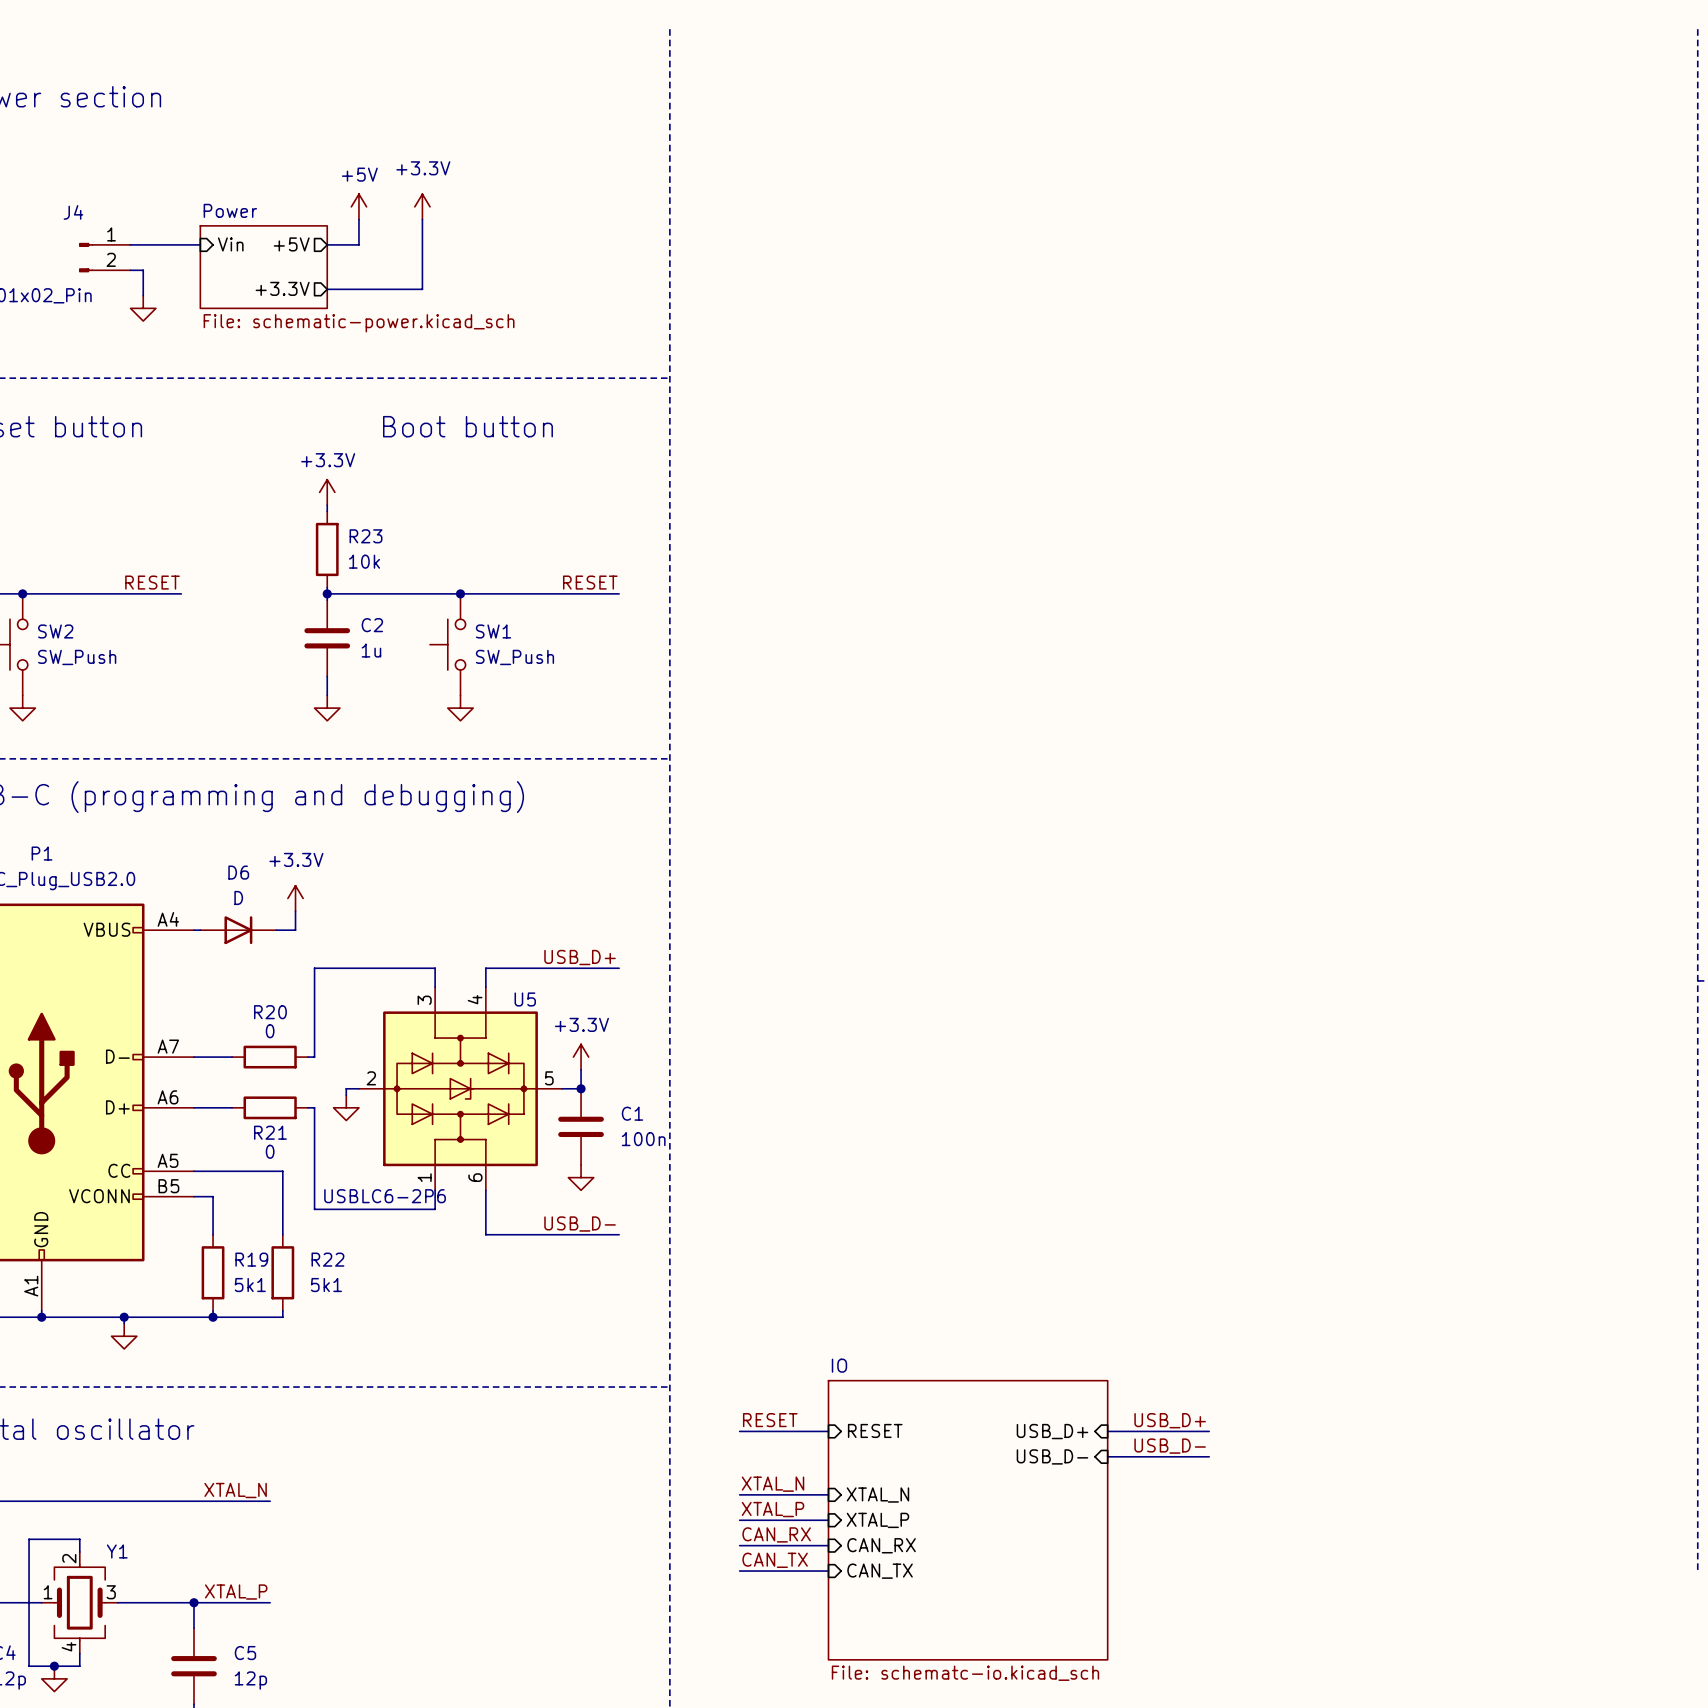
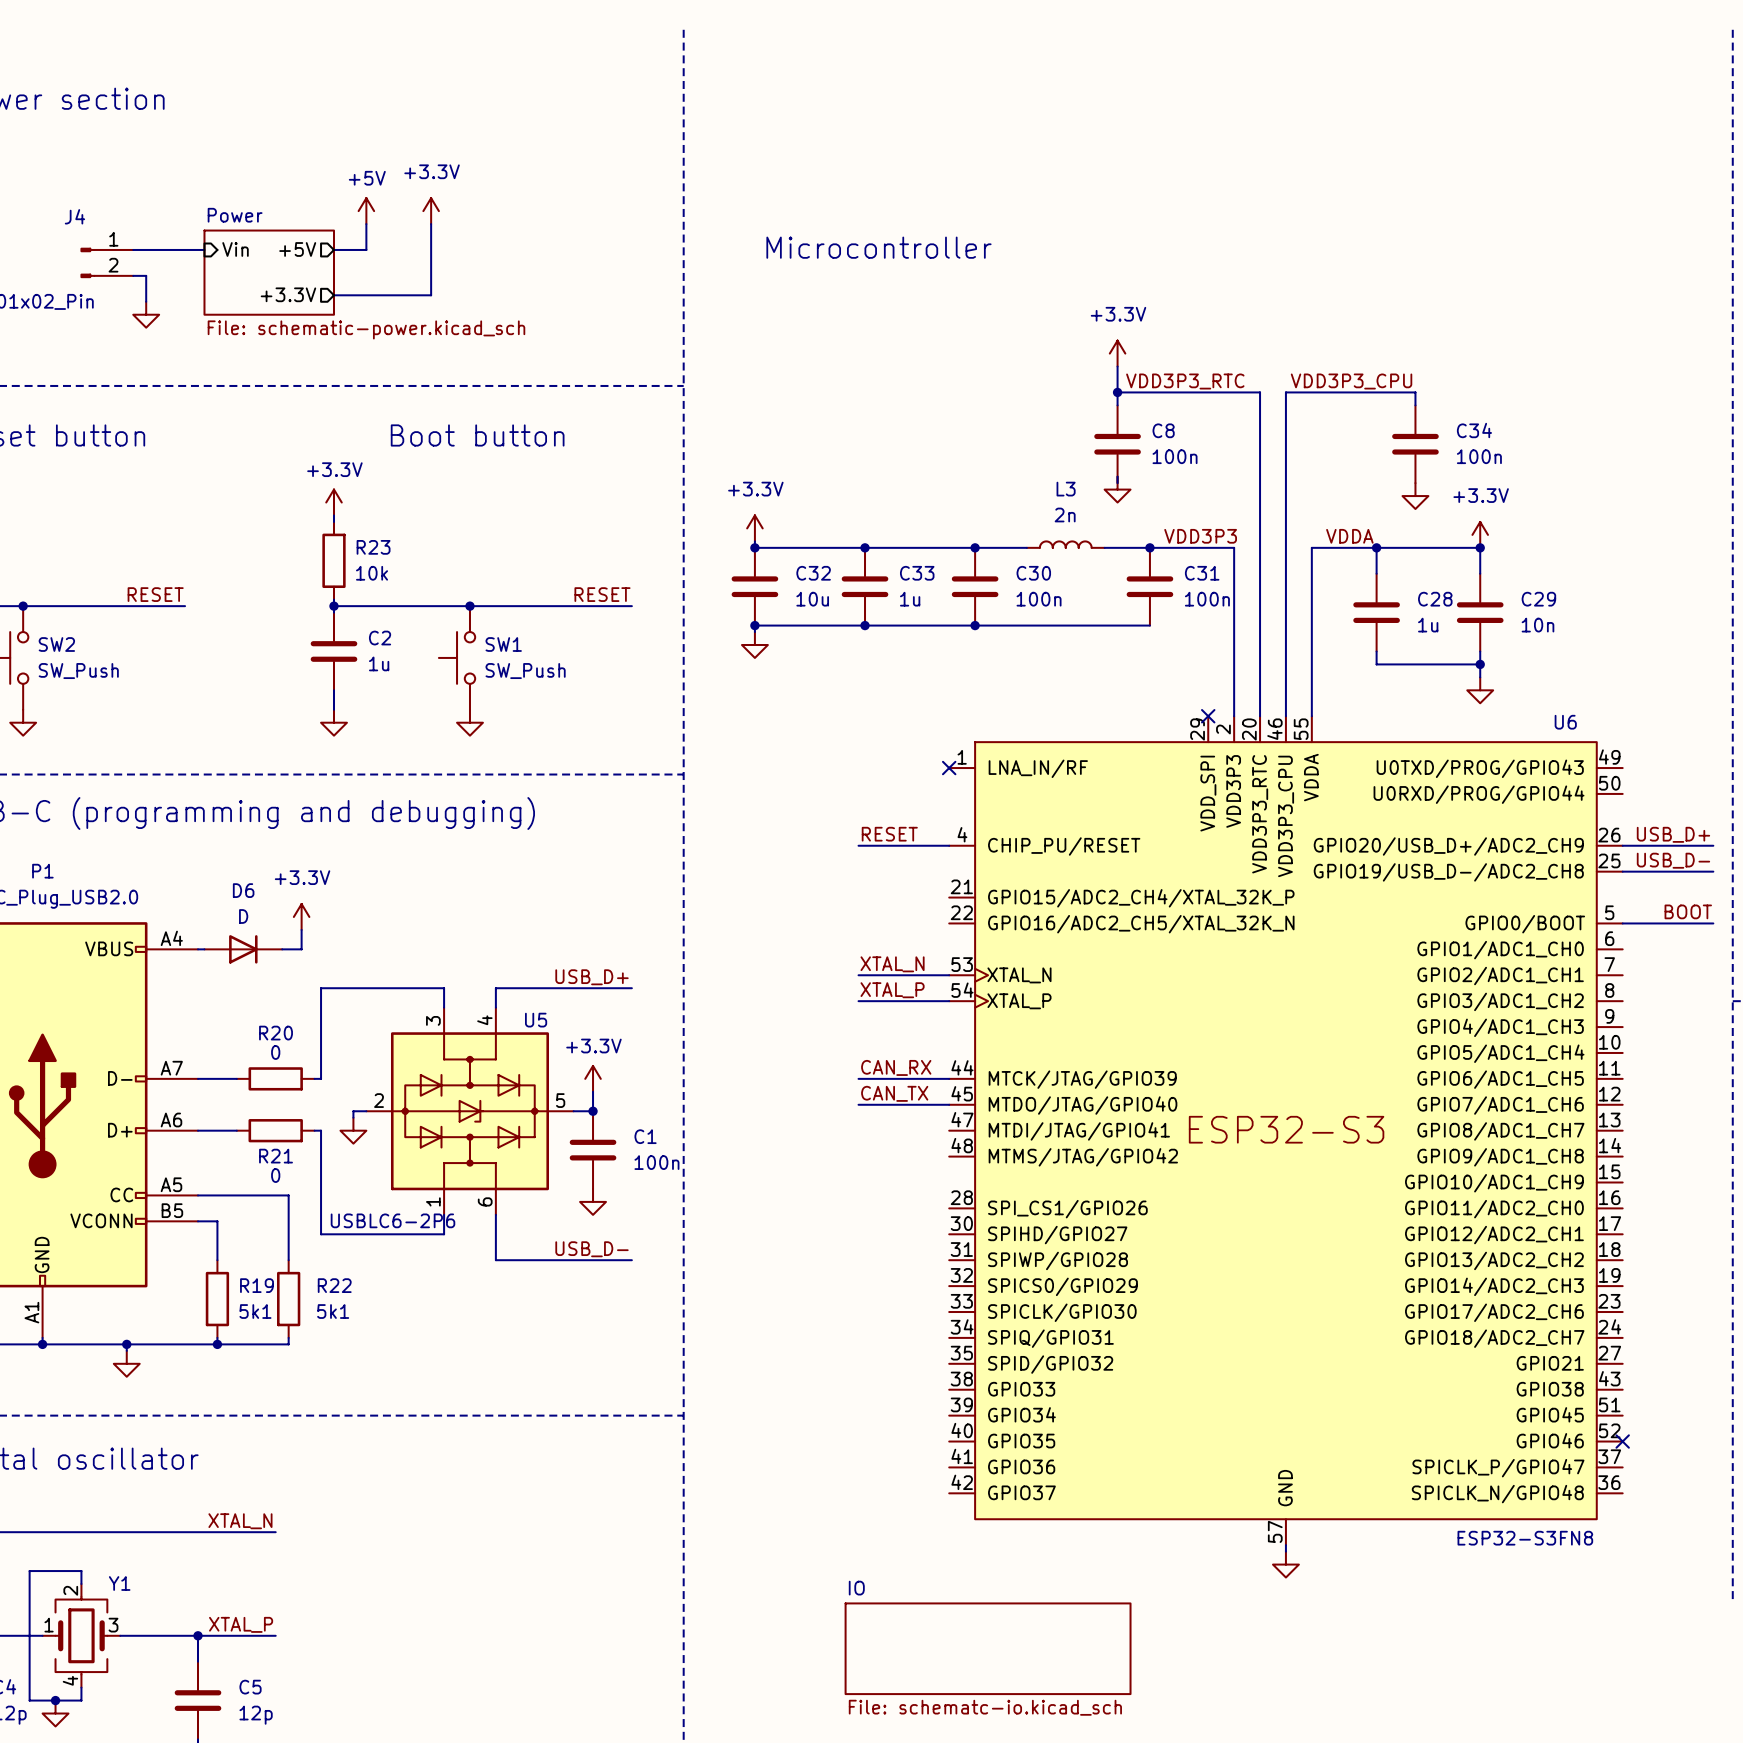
text: none -> Microcontroller (878, 247)
power symbol: none -> +3.3V (1117, 353)
wire: none -> (1117, 366) (1117, 405)
label: none -> VDD3P3_RTC (1185, 381)
label: none -> VDD3P3_CPU (1351, 381)
wire: none -> (1117, 392) (1260, 392) (1260, 716)
junction: none -> (1117, 392)
wire: none -> (1415, 405) (1415, 392) (1285, 392) (1285, 716)
C8: none -> 100n (1117, 444)
C34: none -> 100n (1415, 444)
wire: none -> (1117, 476) (1117, 483)
power symbol: none -> (1117, 489)
power symbol: none -> (1415, 496)
power symbol: none -> +3.3V (754, 528)
power symbol: none -> +3.3V (1480, 534)
label: none -> VDD3P3 (1200, 536)
label: none -> VDDA (1349, 536)
wire: none -> (754, 541) (754, 547) (1026, 547)
L3: none -> 2n (1065, 544)
junction: none -> (754, 547)
junction: none -> (865, 547)
junction: none -> (975, 547)
wire: none -> (1104, 547) (1234, 547) (1234, 716)
junction: none -> (1149, 547)
wire: none -> (1376, 547) (1376, 573)
junction: none -> (1376, 547)
junction: none -> (1480, 547)
wire: none -> (1480, 573) (1480, 547) (1311, 547) (1311, 716)
C32: none -> 10u (754, 586)
C33: none -> 1u (865, 586)
C30: none -> 100n (975, 586)
C31: none -> 100n (1149, 586)
C28: none -> 1u (1376, 612)
C29: none -> 10n (1480, 612)
junction: none -> (754, 625)
junction: none -> (865, 625)
junction: none -> (975, 625)
wire: none -> (1149, 625) (754, 625) (754, 632)
power symbol: none -> (754, 644)
wire: none -> (1376, 651) (1376, 664) (1480, 664)
wire: none -> (1480, 651) (1480, 677)
junction: none -> (1480, 664)
power symbol: none -> (1480, 690)
no-connect mark: none -> (1208, 716)
no-connect mark: none -> (949, 768)
label: none -> RESET (889, 834)
label: none -> USB_D+ (1673, 834)
wire: none -> (858, 845) (949, 845)
wire: none -> (1622, 845) (1713, 845)
label: none -> USB_D- (1673, 860)
wire: none -> (1622, 871) (1713, 871)
label: none -> BOOT (1688, 911)
wire: none -> (1622, 923) (1713, 923)
label: none -> XTAL_N (892, 964)
wire: none -> (858, 975) (949, 975)
label: none -> XTAL_P (892, 990)
wire: none -> (858, 1001) (949, 1001)
label: none -> CAN_RX (896, 1067)
wire: none -> (858, 1078) (949, 1078)
label: none -> CAN_TX (894, 1093)
wire: none -> (858, 1104) (949, 1104)
U6: none -> ESP32-S3FN8 (1285, 1130)
no-connect mark: none -> (1622, 1441)
label: RESET (770, 1420) -> none
label: USB_D+ (1170, 1420) -> none
sheet pin: RESET (875, 1430) -> none
wire: (739, 1431) (828, 1431) -> none
sheet pin: USB_D+ (1052, 1431) -> none
label: USB_D- (1170, 1446) -> none
sheet pin: USB_D- (1052, 1456) -> none
label: XTAL_N (773, 1484) -> none
wire: (739, 1494) (828, 1494) -> none
sheet pin: XTAL_N (877, 1495) -> none
label: XTAL_P (773, 1509) -> none
wire: none -> (1285, 1545) (1285, 1551)
wire: (739, 1520) (828, 1520) -> none
sheet pin: XTAL_P (877, 1520) -> none
sheet IO: File: schematc-io.kicad_sch (968, 1520) -> none
power symbol: none -> (1285, 1564)
label: CAN_RX (776, 1534) -> none
wire: (739, 1545) (828, 1545) -> none
sheet pin: CAN_RX (881, 1545) -> none
label: CAN_TX (775, 1560) -> none
wire: (739, 1571) (828, 1571) -> none
sheet pin: CAN_TX (880, 1571) -> none
sheet IO: none -> File: schematc-io.kicad_sch (988, 1648)

